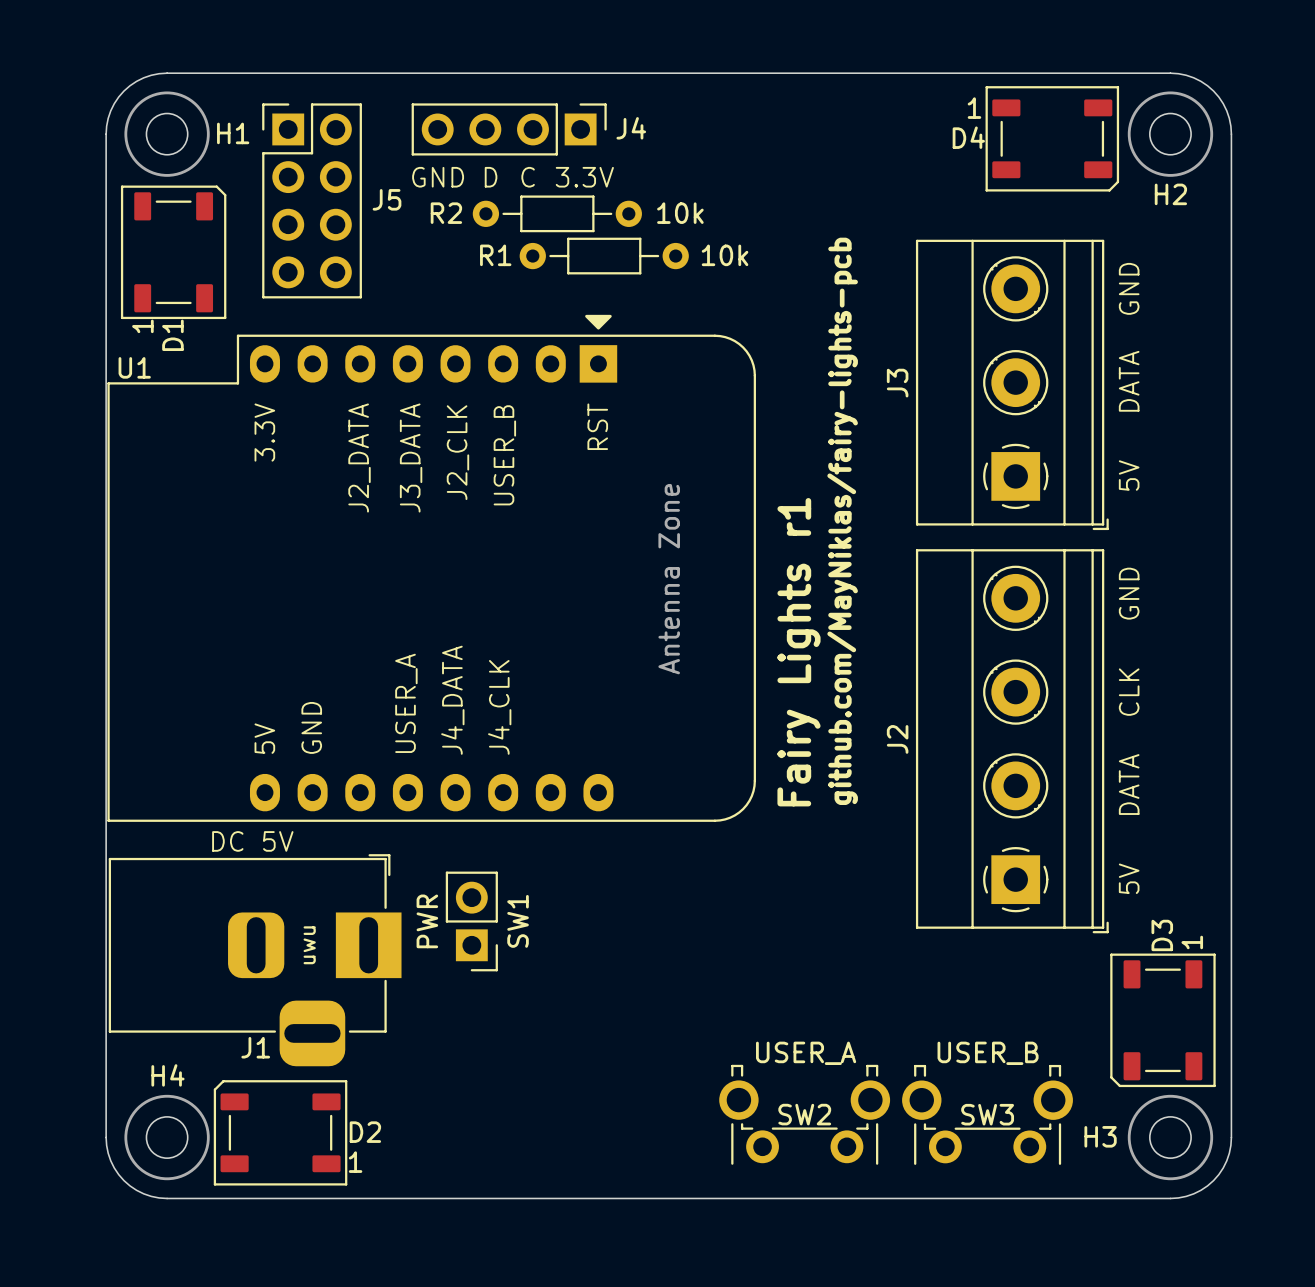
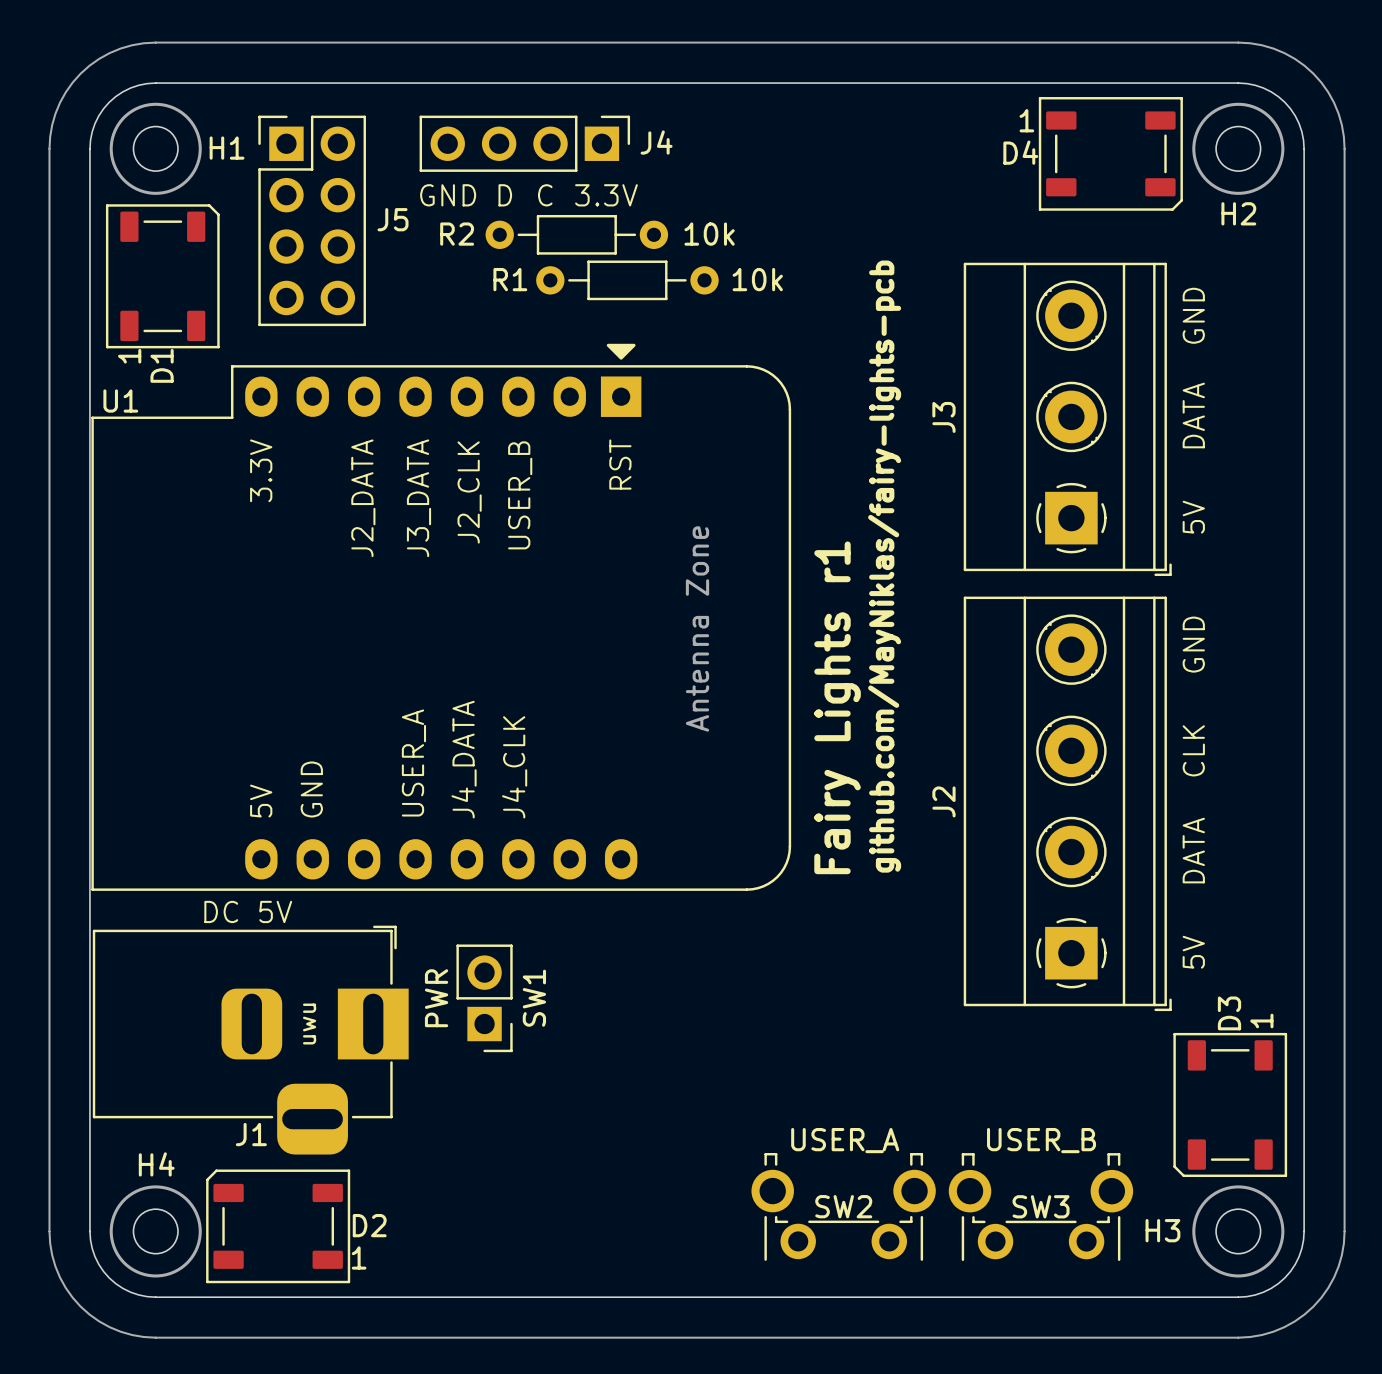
line: none -> (155, 42) (1238, 42) (1261, 45) (1284, 53) (1313, 73) (1334, 102) (1341, 125) (1344, 148) (1344, 1231) (1341, 1255) (1334, 1277) (1313, 1306) (1284, 1327) (1261, 1335) (1238, 1337) (155, 1337) (132, 1335) (109, 1327) (80, 1306) (60, 1277) (52, 1255) (49, 1231) (50, 136) (60, 102) (80, 73) (109, 53) (132, 45) (155, 42)

